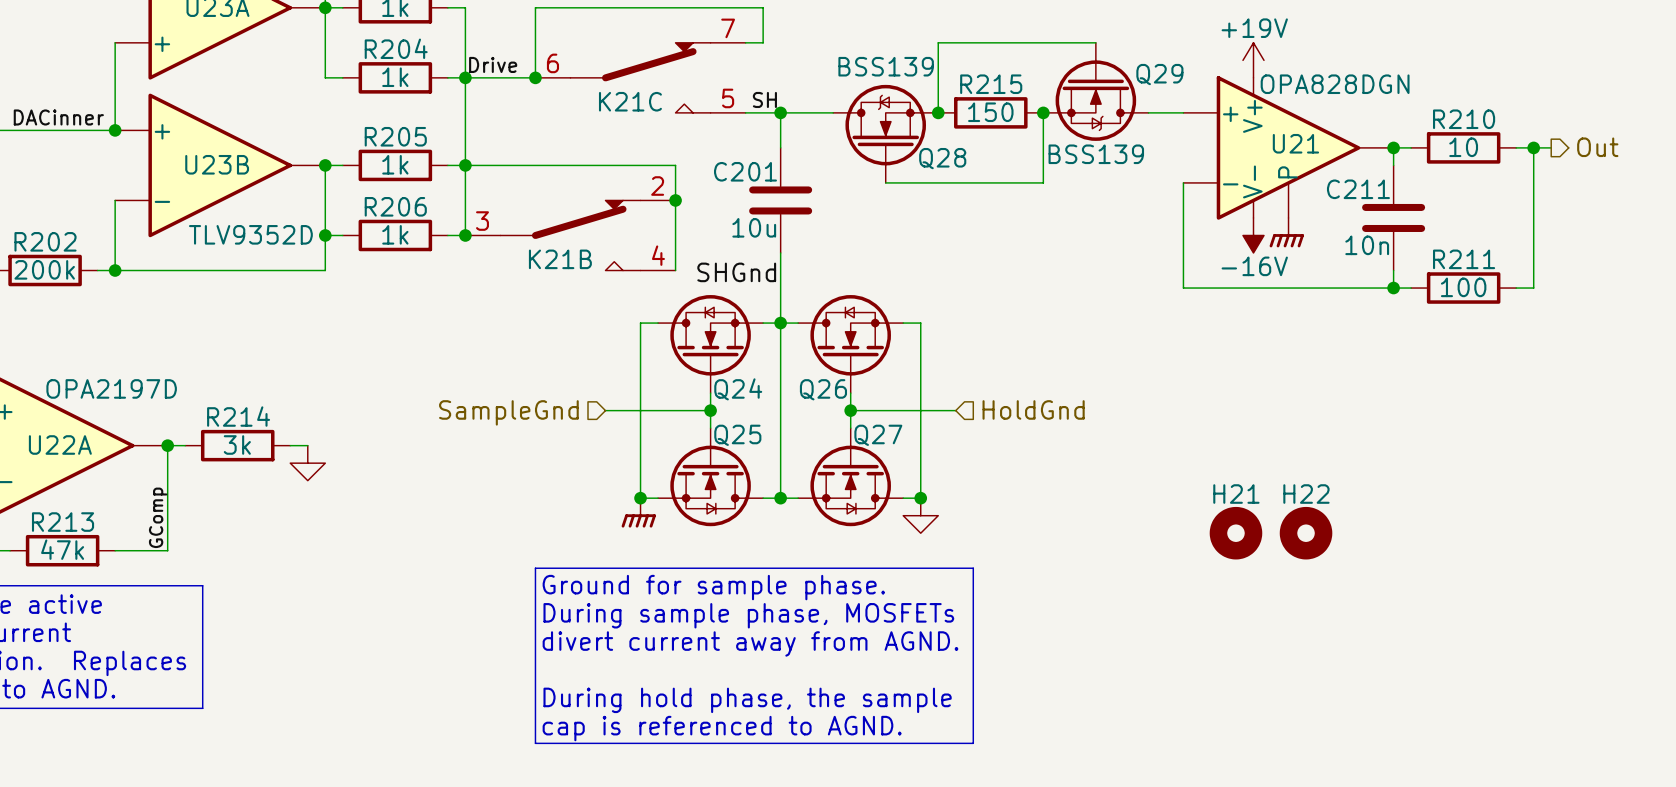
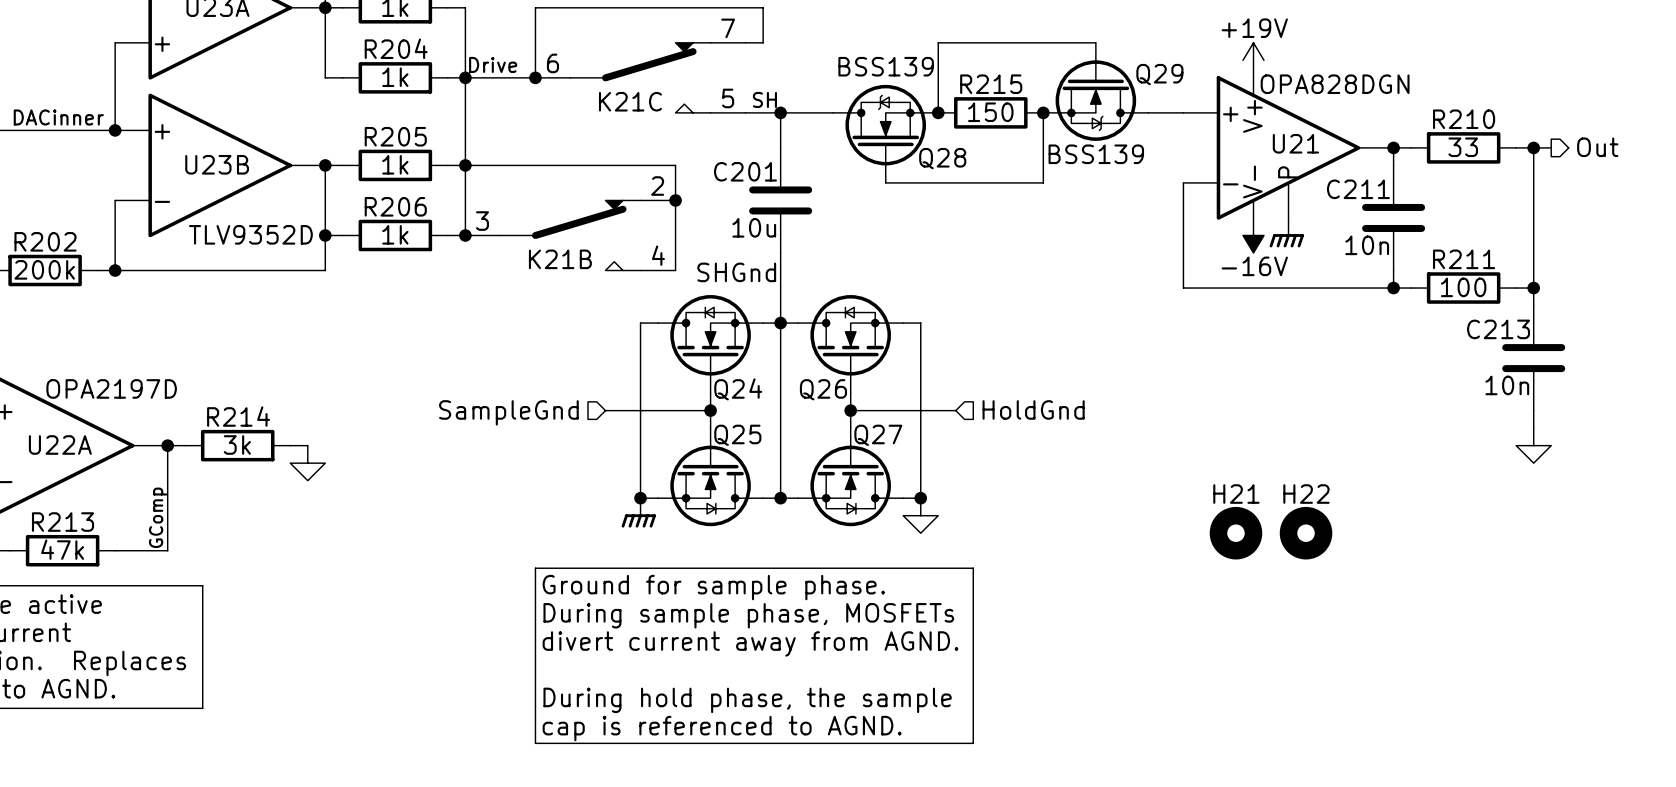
R210 value: 10 (1463, 147) -> 33 (1463, 147)
wire: none -> (1533, 288) (1533, 305)
junction: none -> (1533, 288)
C213: none -> 10n (1533, 358)
wire: none -> (1533, 410) (1533, 428)
power symbol: none -> (1533, 445)

